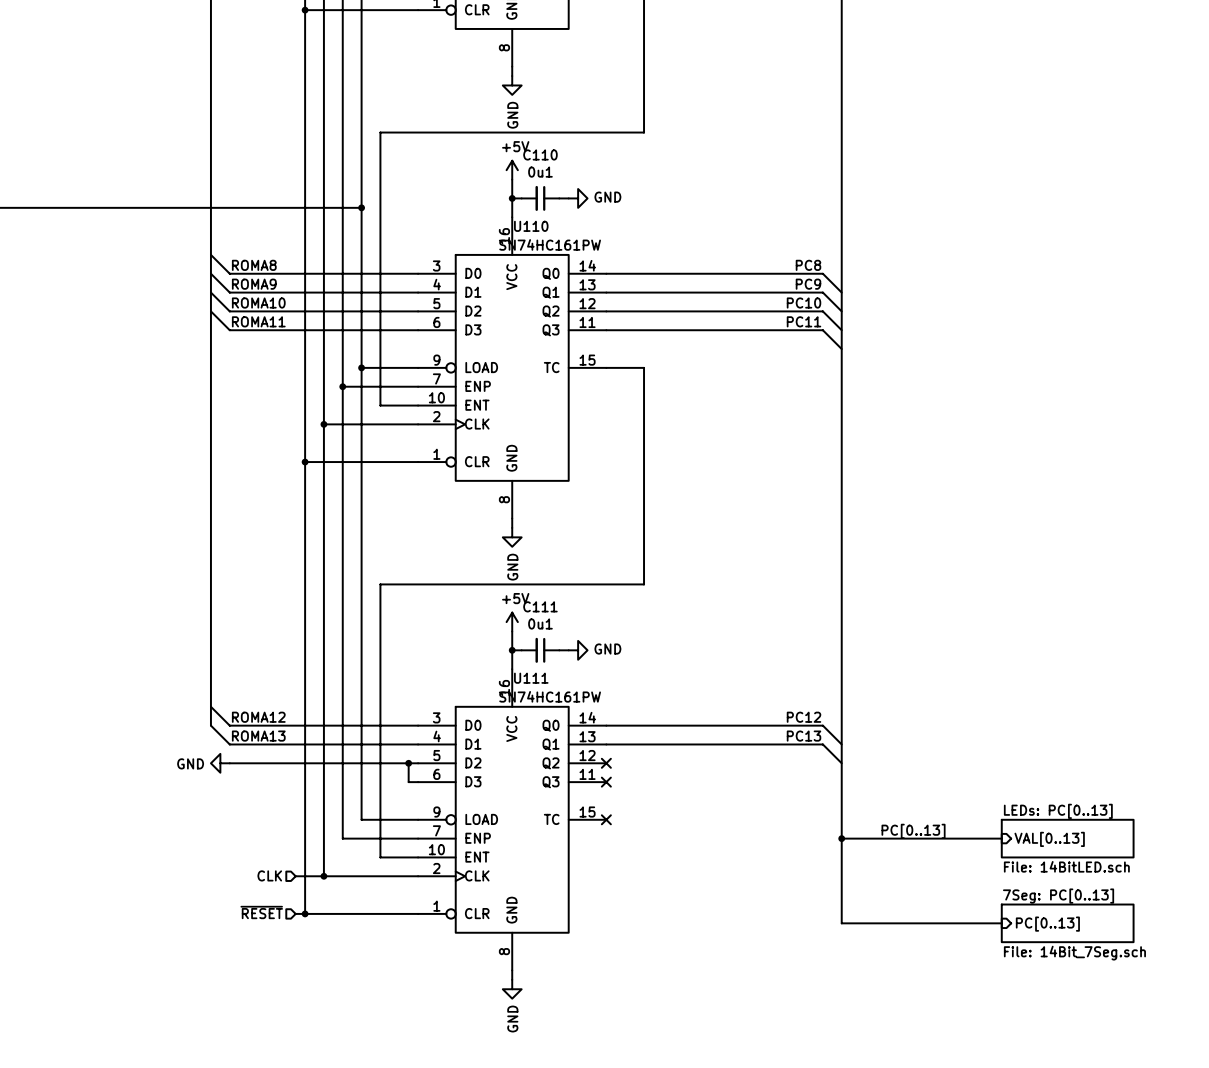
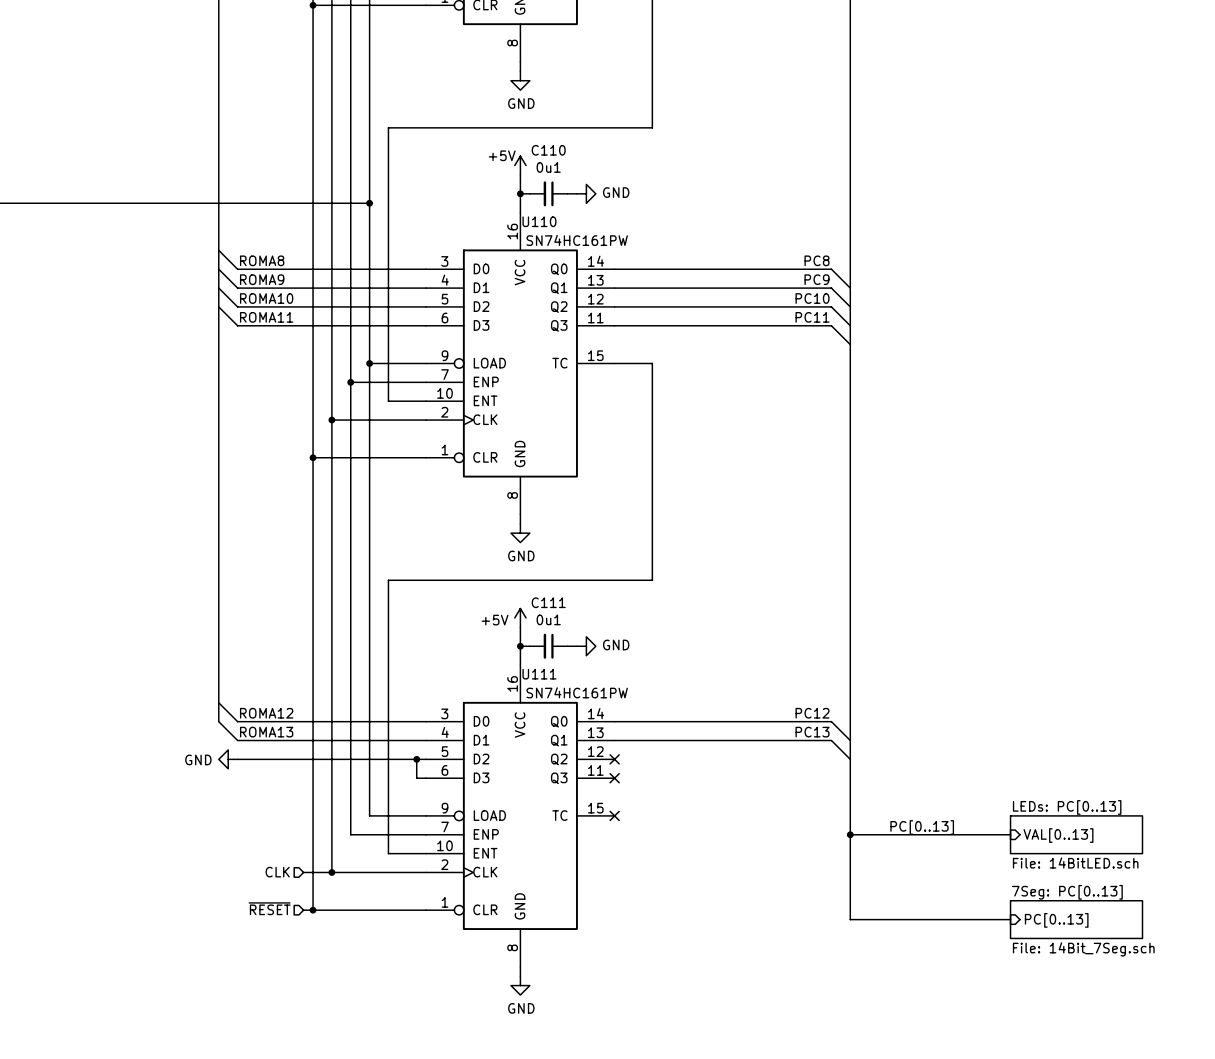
power symbol text rotation: 0° (512, 115) -> 90° clockwise (521, 103)
power symbol text position: +5V (515, 146) -> +5V (502, 155)
U110 value position: SN74HC161PW (550, 244) -> SN74HC161PW (577, 240)
power symbol text rotation: 0° (512, 567) -> 90° clockwise (521, 555)
power symbol text position: +5V (515, 598) -> +5V (495, 620)
U111 value position: SN74HC161PW (550, 696) -> SN74HC161PW (577, 692)
power symbol text rotation: 0° (512, 1019) -> 90° clockwise (521, 1008)

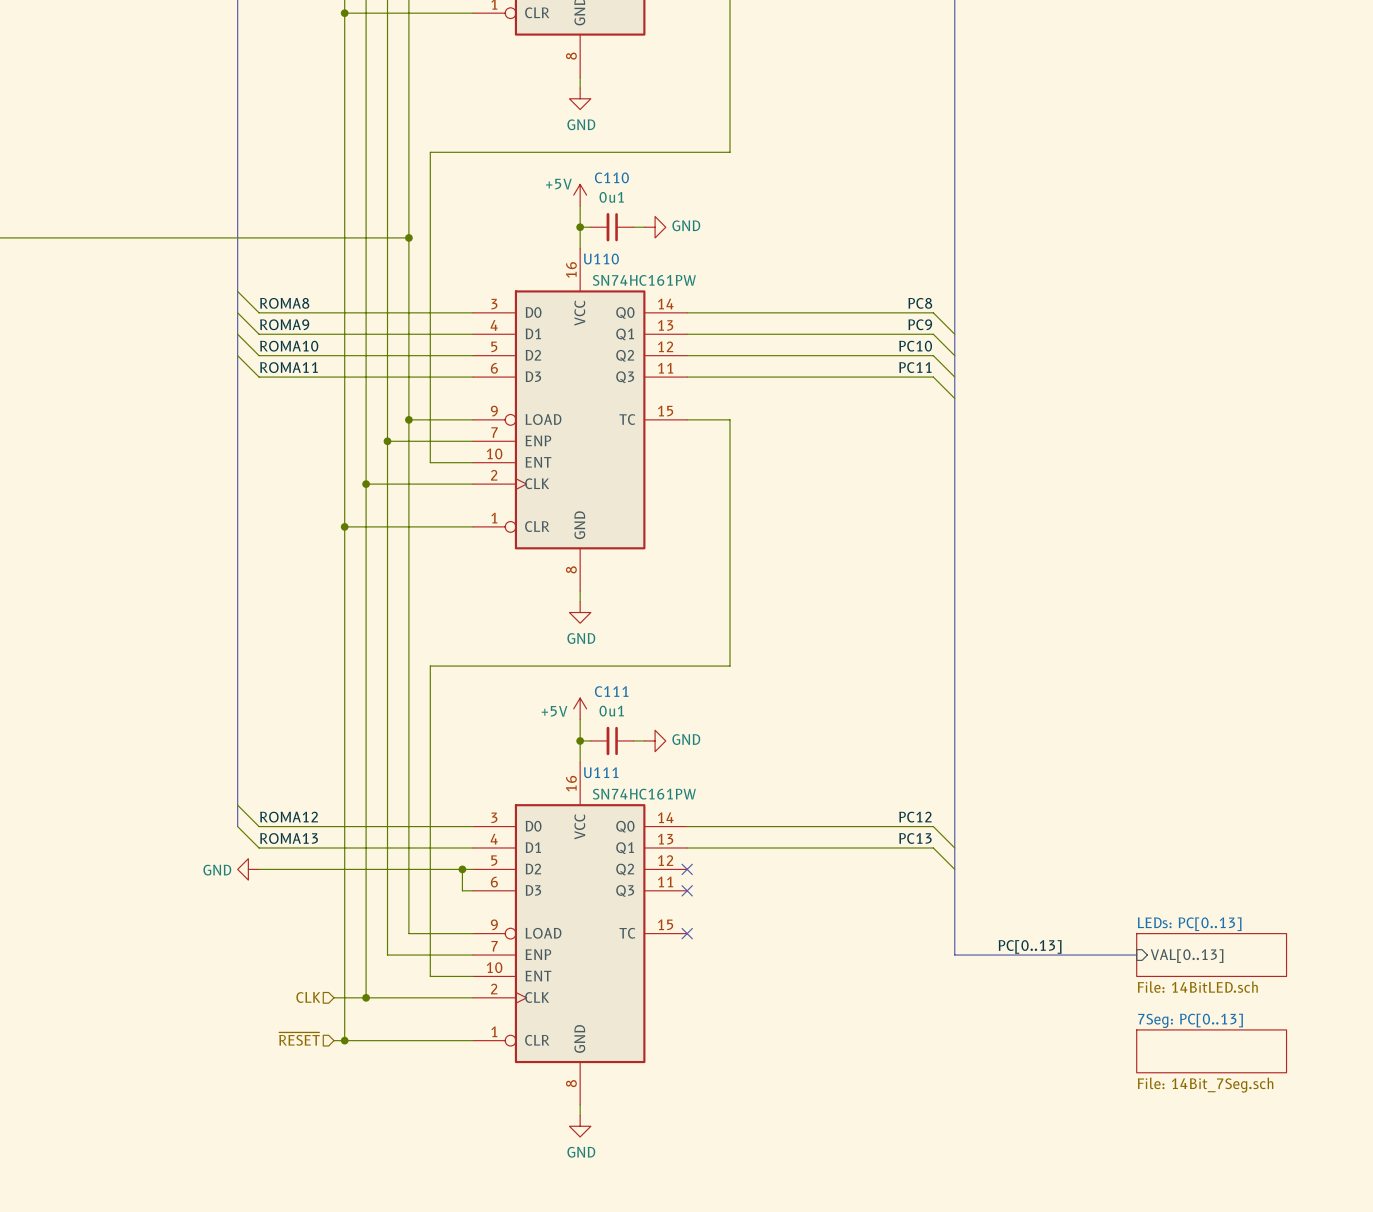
bus: (850, 834) (850, 919) (1010, 919) -> none
junction: (850, 834) -> none
sheet pin: PC[0..13] (1056, 920) -> none

